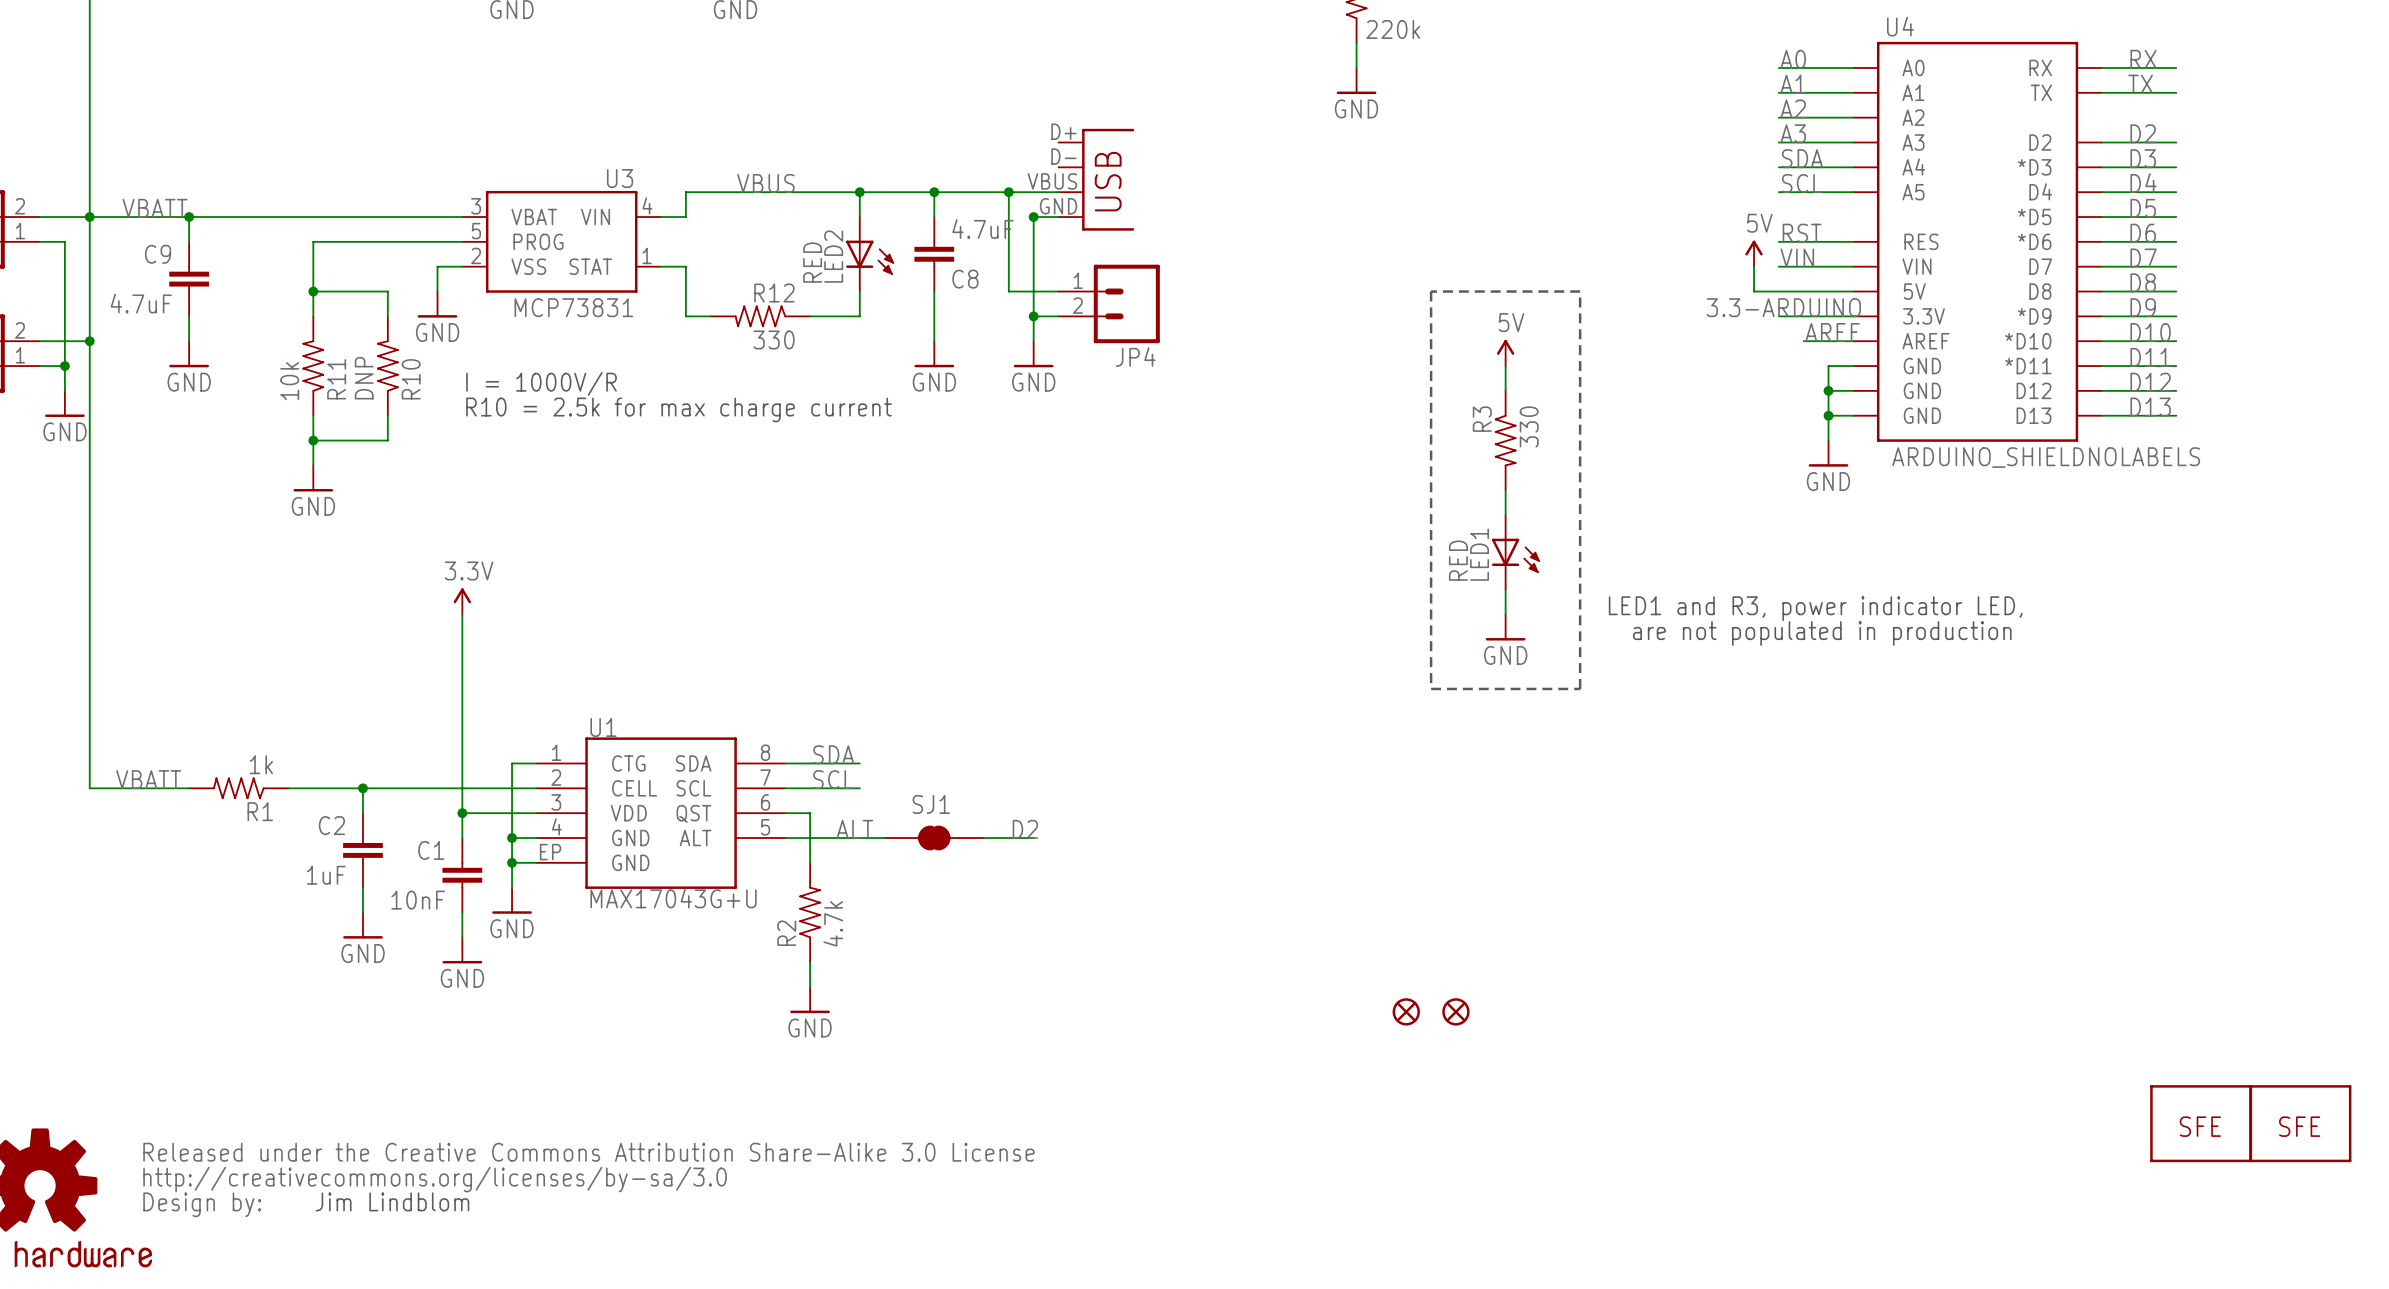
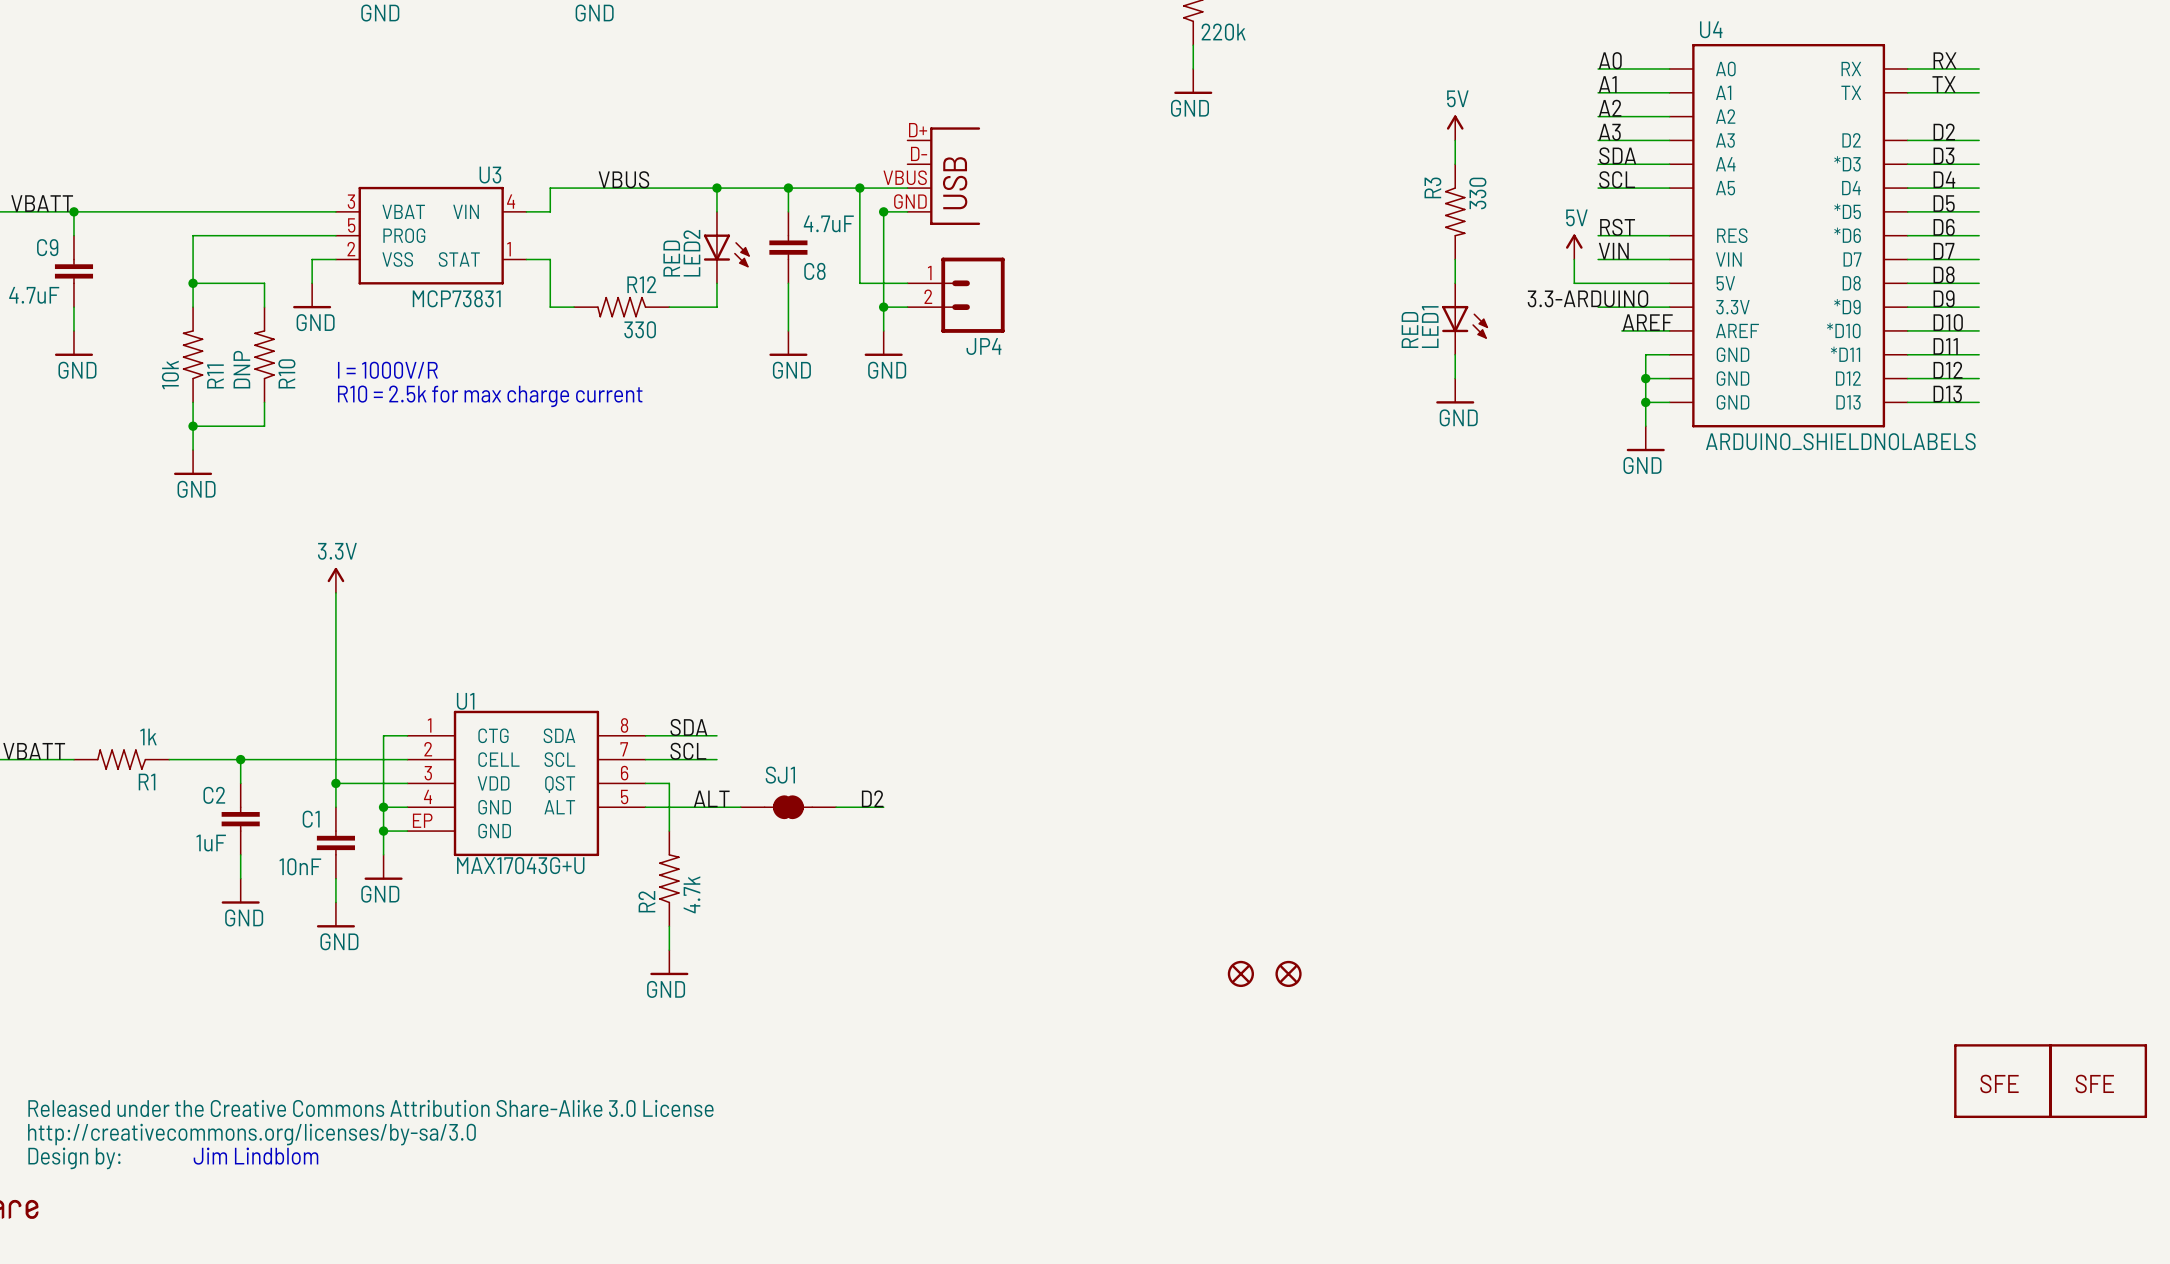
power symbol: none -> 5V (1455, 127)
wire: none -> (1455, 140) (1455, 164)
wire: none -> (1455, 259) (1455, 283)
line: (1431, 291) (1431, 688) (1580, 688) (1580, 291) (1431, 291) -> none
power symbol: 5V (1505, 353) -> none
wire: (1505, 366) (1505, 390) -> (1455, 354) (1455, 378)
power symbol: none -> GND (1455, 391)
R3 position: (1505, 440) -> (1455, 211)
wire: (1505, 490) (1505, 515) -> none
LED1 position: (1515, 552) -> (1465, 319)
wire: (1505, 589) (1505, 614) -> none
text: LED1 and R3, power indicator LED, (1815, 608) -> none
power symbol: GND (1505, 627) -> none
text: are not populated in production (1822, 633) -> none

